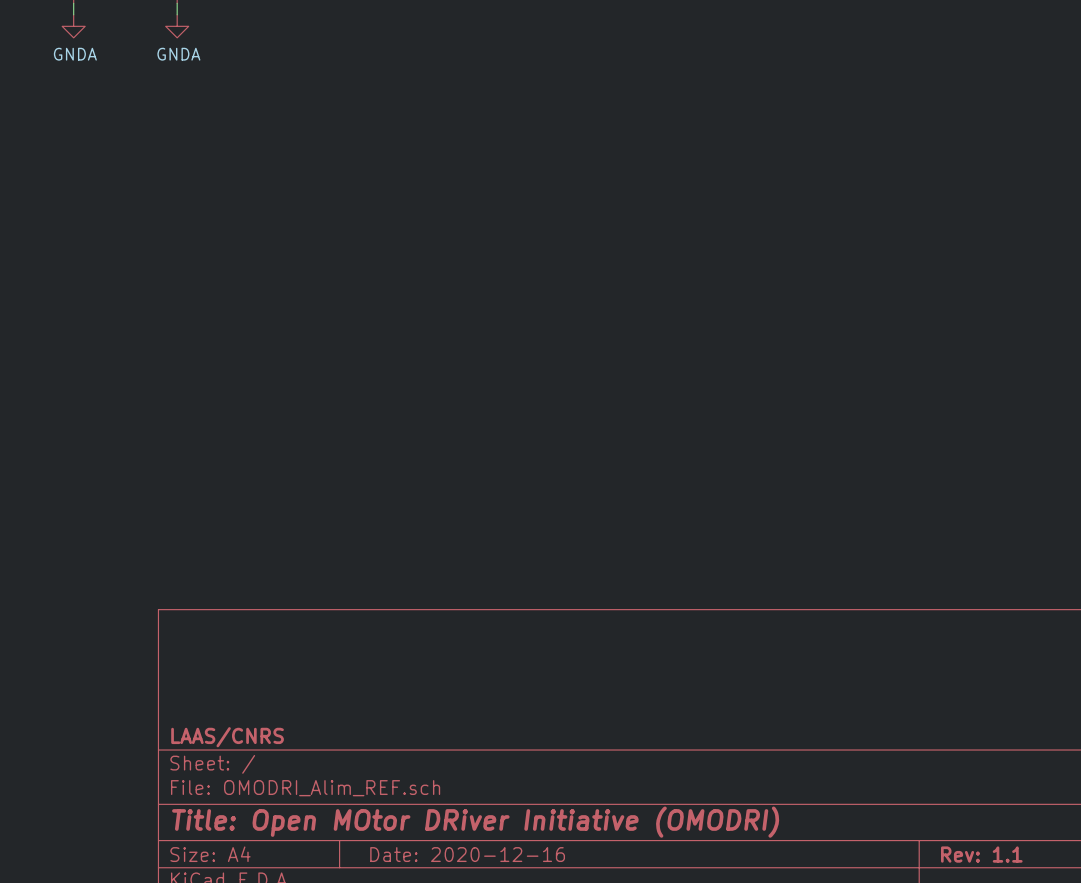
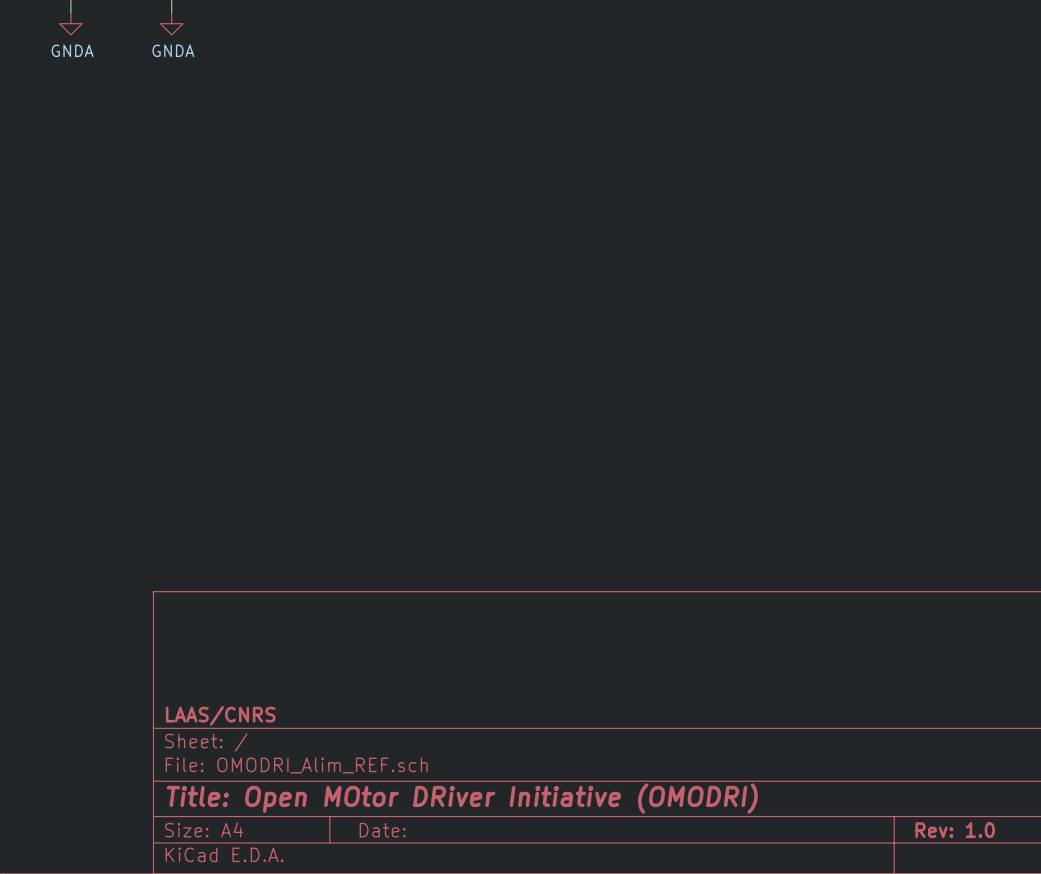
title block: Date: 2020-12-16 (467, 854) -> Date: (382, 830)
title block: Rev: 1.1 (981, 854) -> Rev: 1.0 (955, 830)

